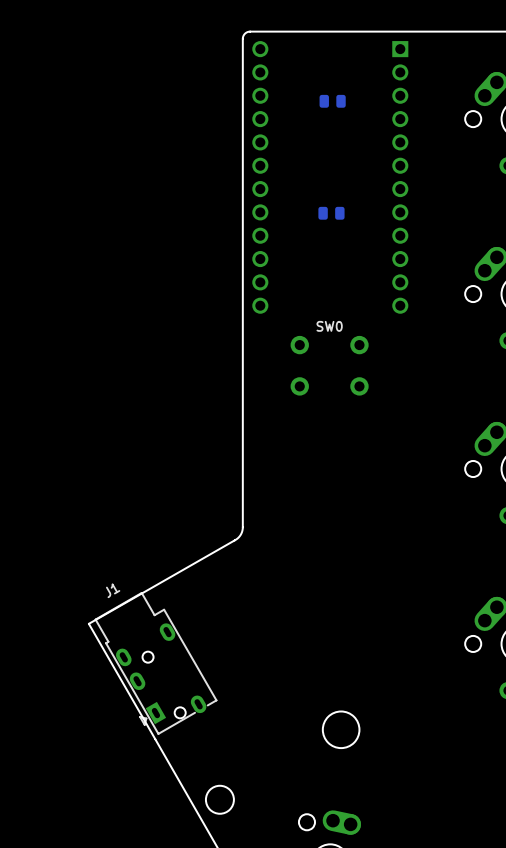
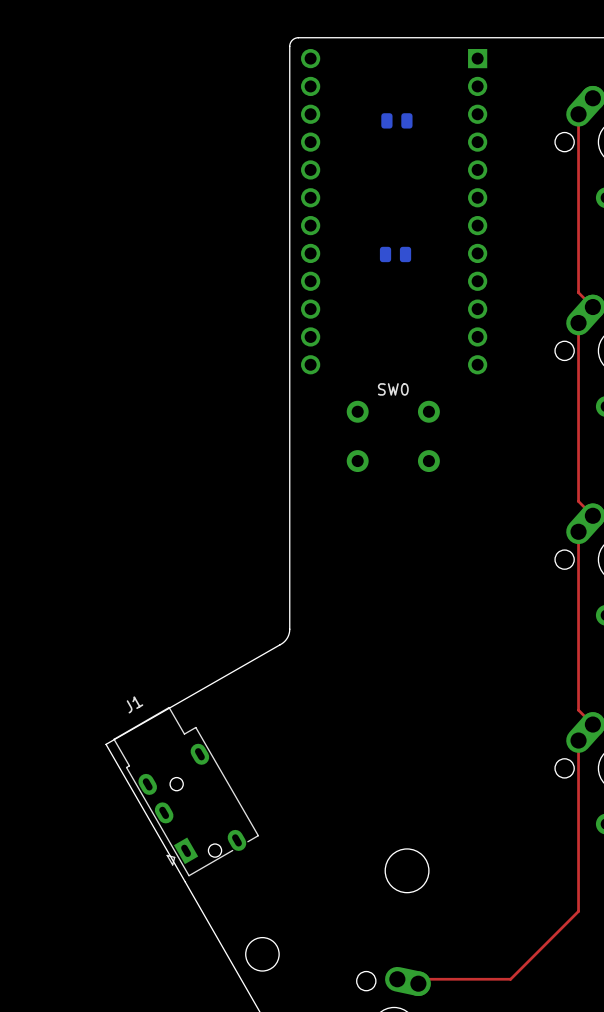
top track: none -> (578, 114) (578, 292) (592, 307)
top track: none -> (578, 323) (578, 501) (592, 515)
top track: none -> (578, 531) (578, 710) (592, 724)
top track: none -> (578, 740) (578, 911) (510, 979) (397, 979)

